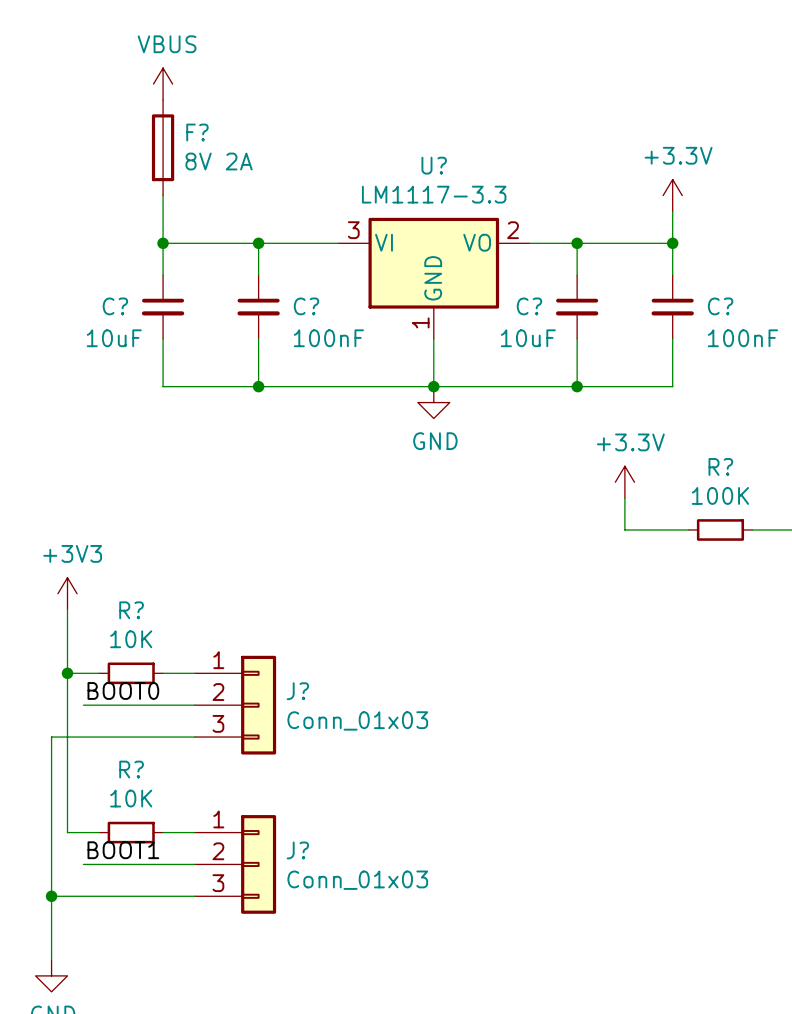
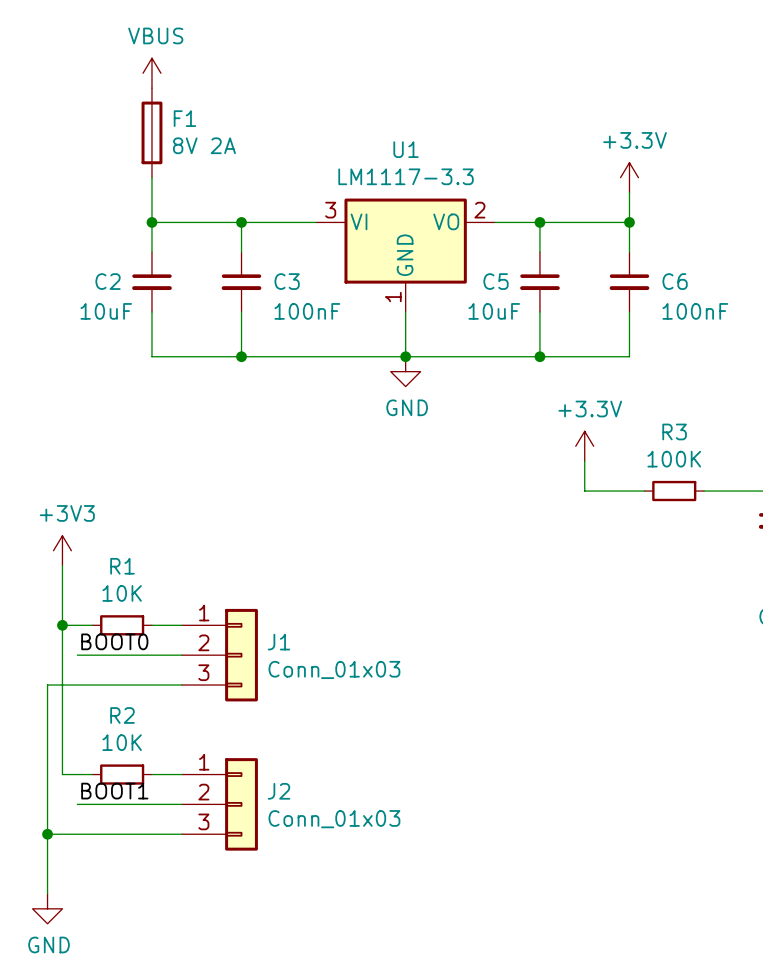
F? name: F? (197, 132) -> F1 (184, 118)
U? name: U? (434, 165) -> U1 (406, 149)
C? name: C? (115, 306) -> C2 (108, 281)
C? name: C? (306, 306) -> C3 (287, 281)
C? name: C? (529, 306) -> C5 (496, 281)
C? name: C? (720, 306) -> C6 (675, 281)
R? name: R? (720, 466) -> R3 (674, 431)
R? name: R? (131, 610) -> R1 (122, 566)
J? name: J? (297, 691) -> J1 (279, 642)
R? name: R? (131, 769) -> R2 (122, 715)
J? name: J? (297, 850) -> J2 (279, 791)

